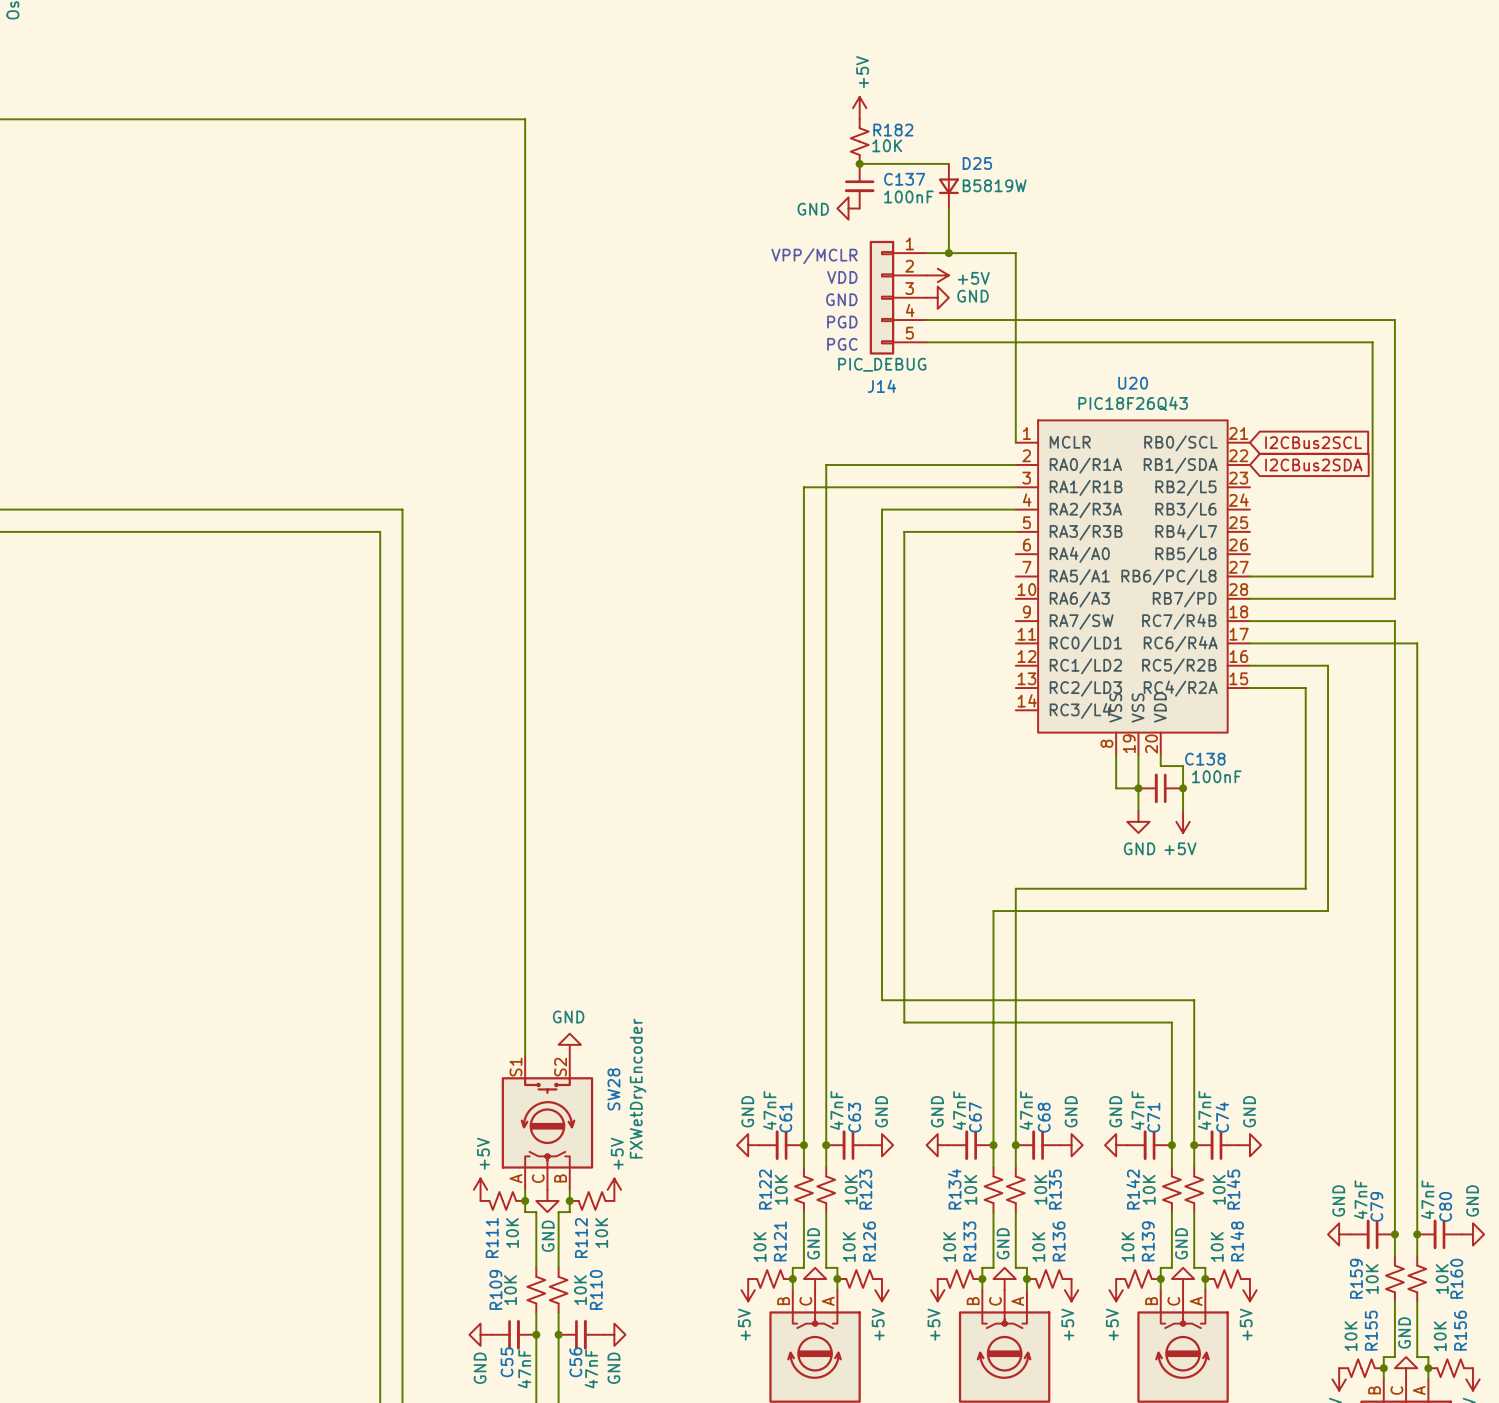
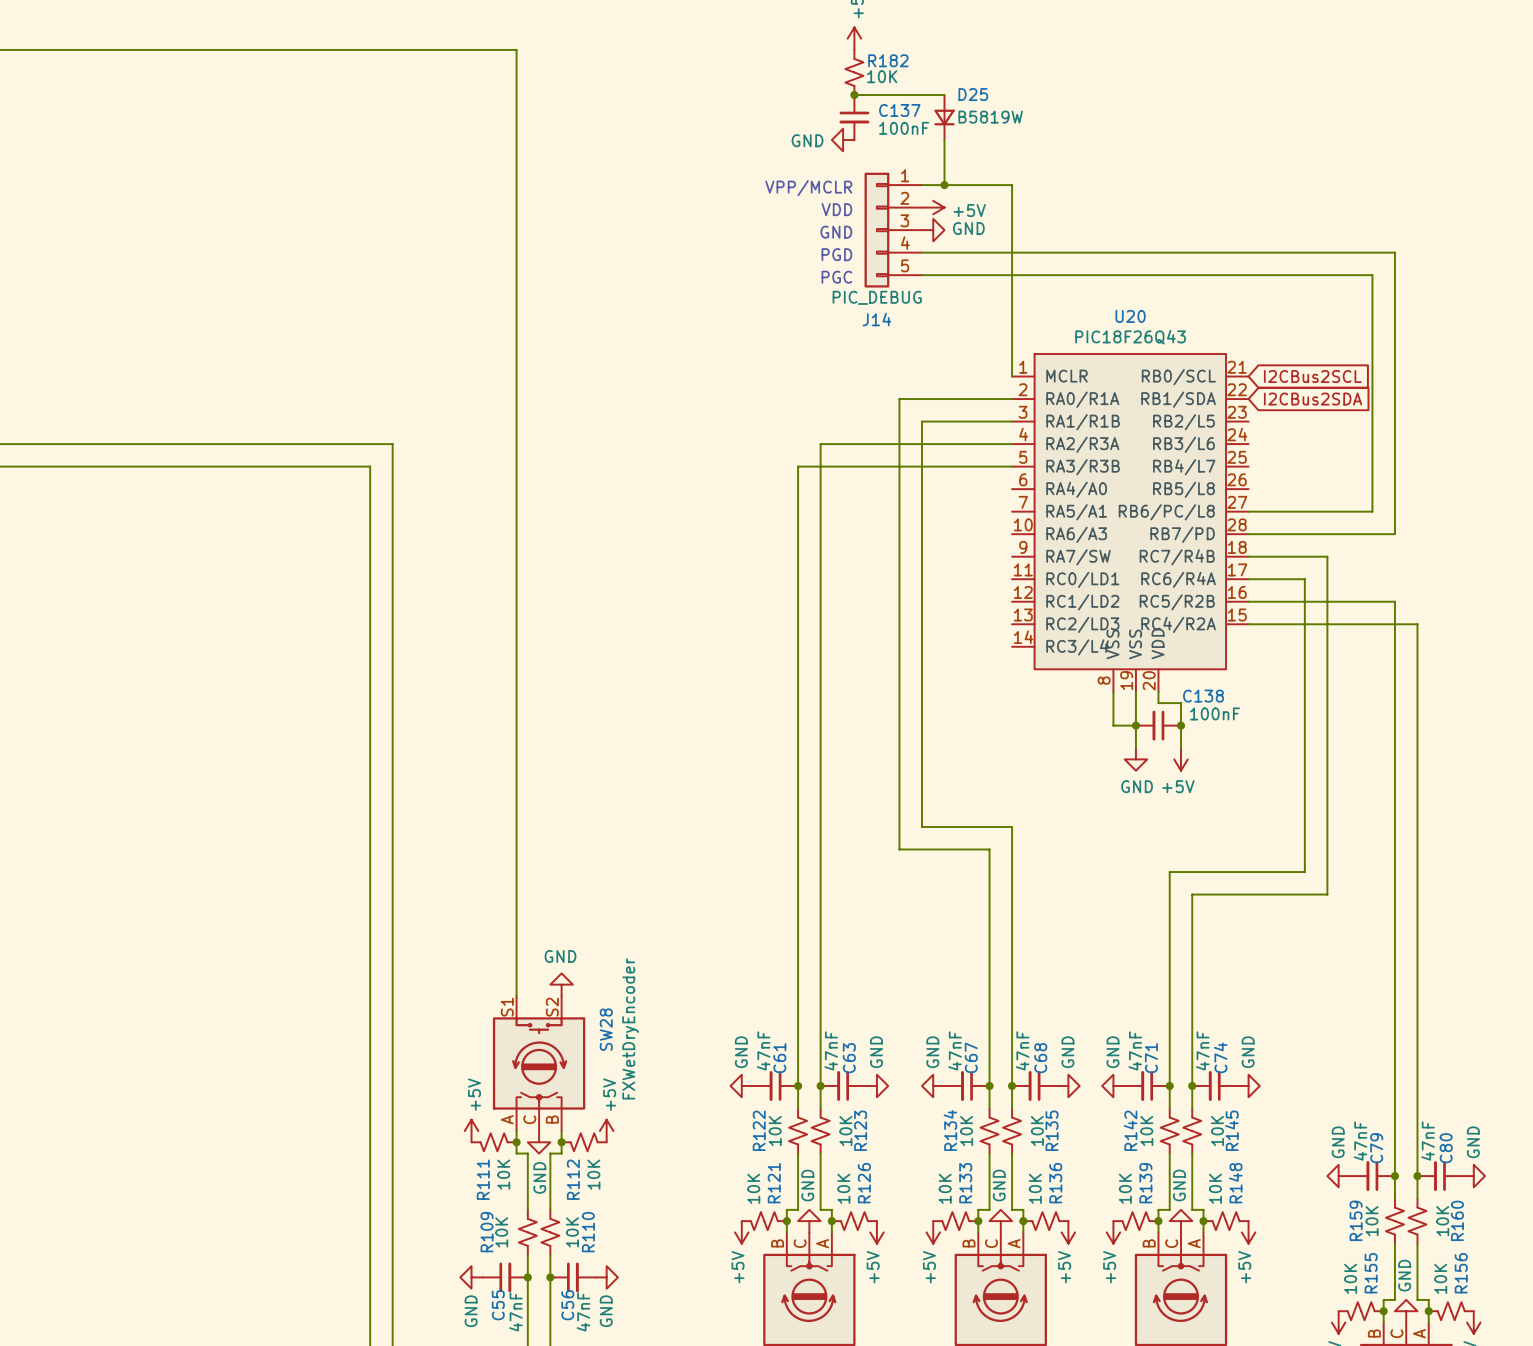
wire: (904, 464) (826, 464) (826, 509) -> (899, 399) (899, 466) (798, 466)
wire: (926, 487) (803, 487) (803, 531) -> (921, 421) (921, 826) (1012, 826)
wire: (881, 509) (881, 1000) (1194, 1000) -> (876, 444) (820, 444)
wire: (1328, 621) (1394, 621) (1394, 665) -> (1327, 556) (1327, 601) (1394, 601)
wire: (1305, 643) (1417, 643) (1417, 688) -> (1304, 579) (1304, 624) (1417, 624)
wire: (1015, 888) (1305, 888) -> (1169, 962) (1169, 872) (1304, 872) (1304, 826)
wire: (904, 911) (904, 1022) (1171, 1022) -> (899, 849) (989, 849)
wire: (993, 911) (1328, 911) -> (1192, 939) (1192, 894) (1327, 894) (1327, 849)

